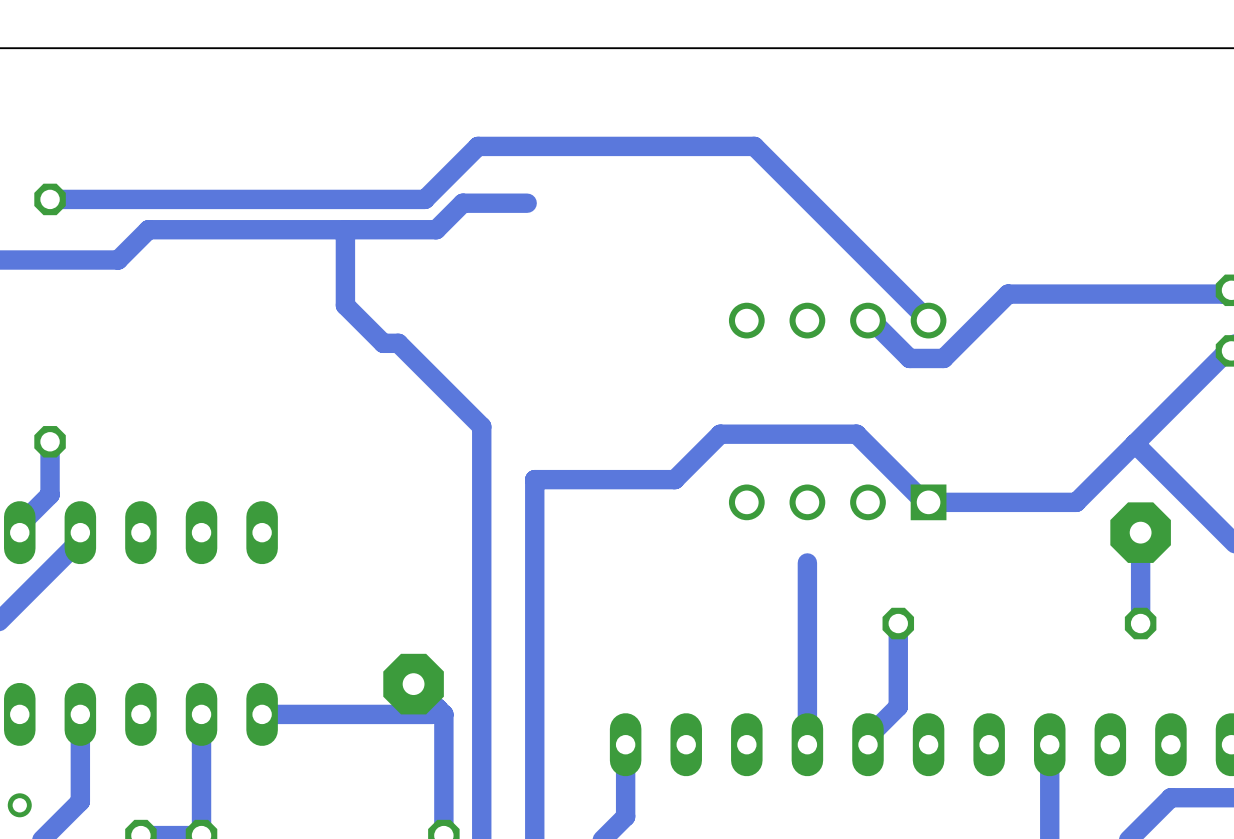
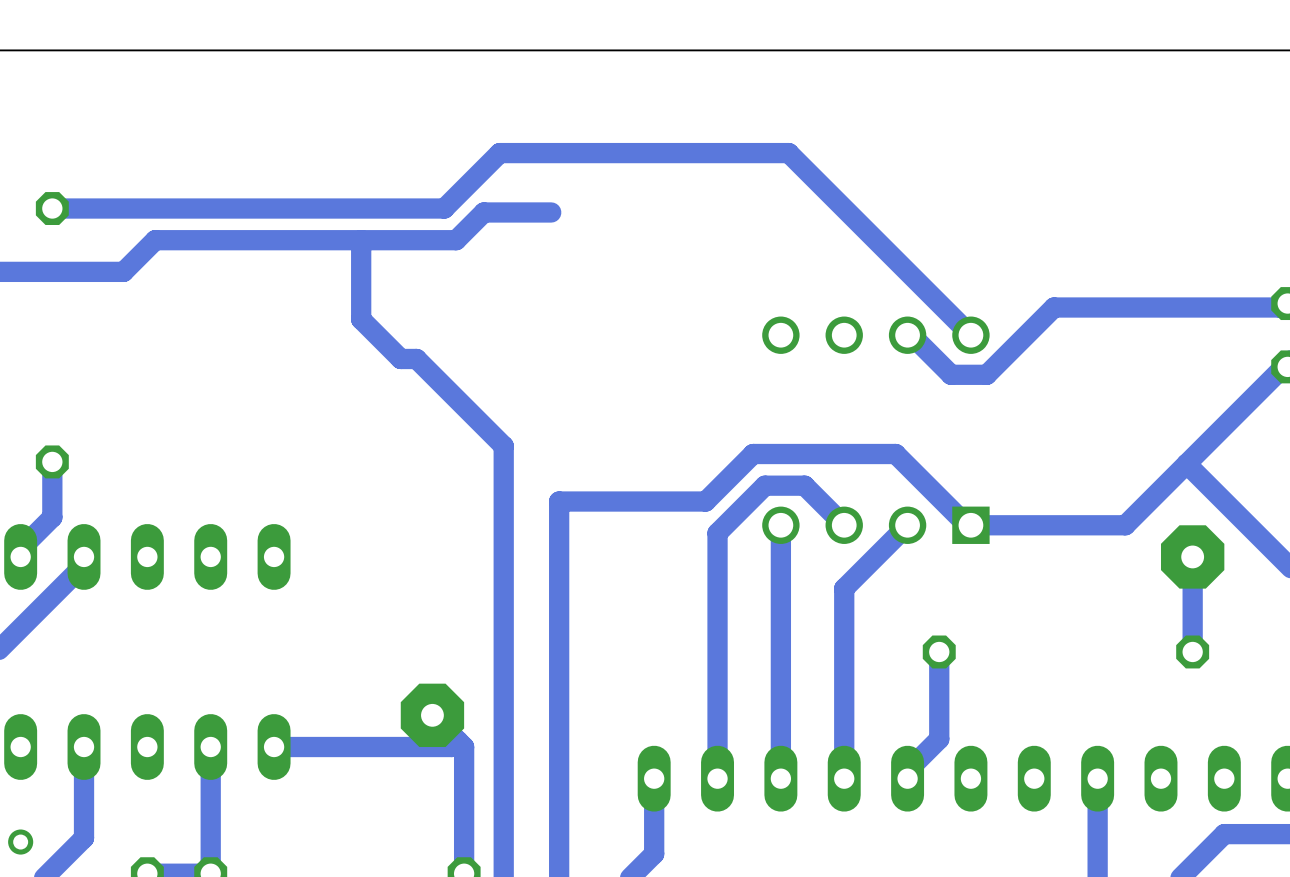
track: none -> (780, 525) (780, 778)
track: none -> (844, 525) (804, 485) (765, 485) (717, 533) (717, 778)
track: none -> (907, 525) (844, 588)

